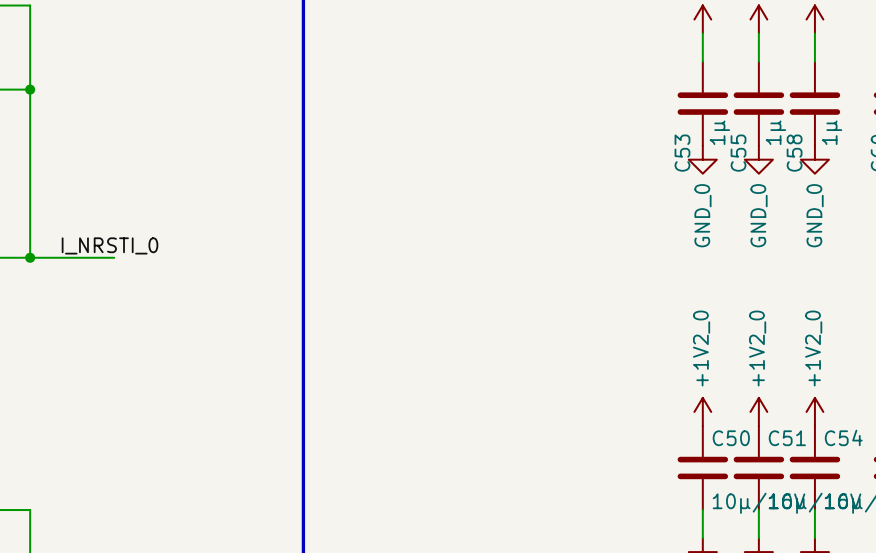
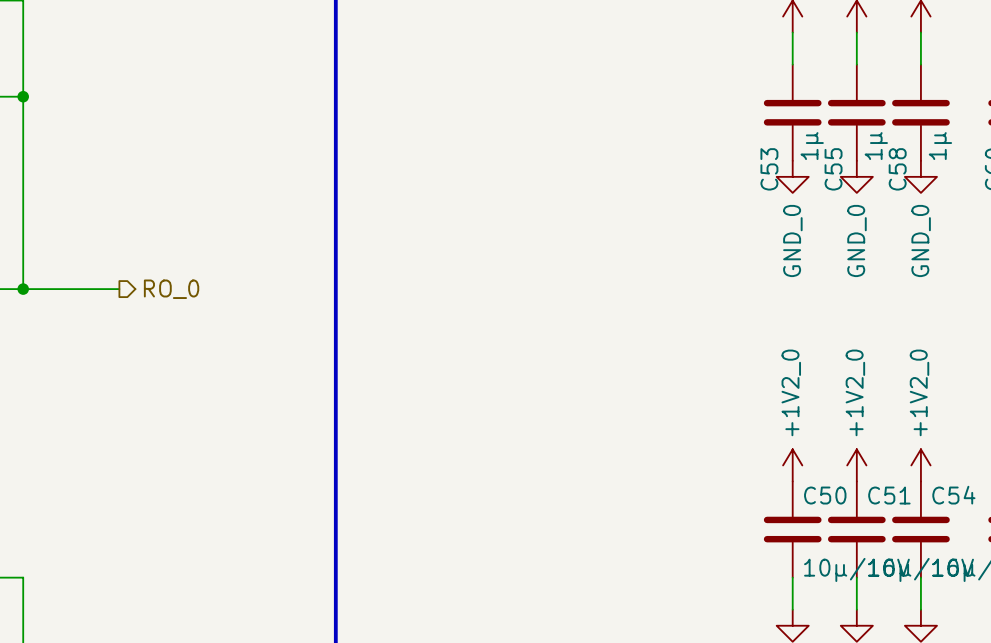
label: I_NRSTI_0 (110, 245) -> none
hierarchical label: none -> RO_0 (171, 289)

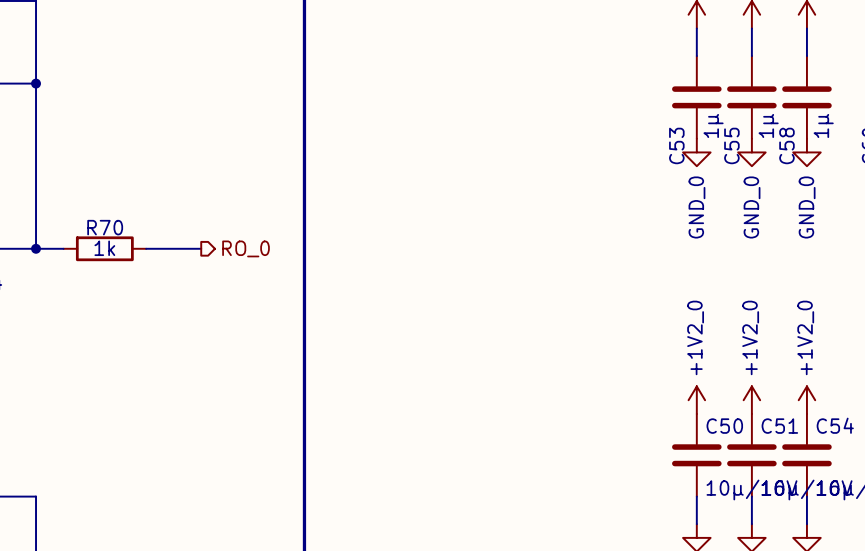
wire: (55, 289) (119, 289) -> (146, 248) (201, 248)
R70: none -> 1k (104, 248)
hierarchical label position: RO_0 (171, 289) -> RO_0 (246, 248)

